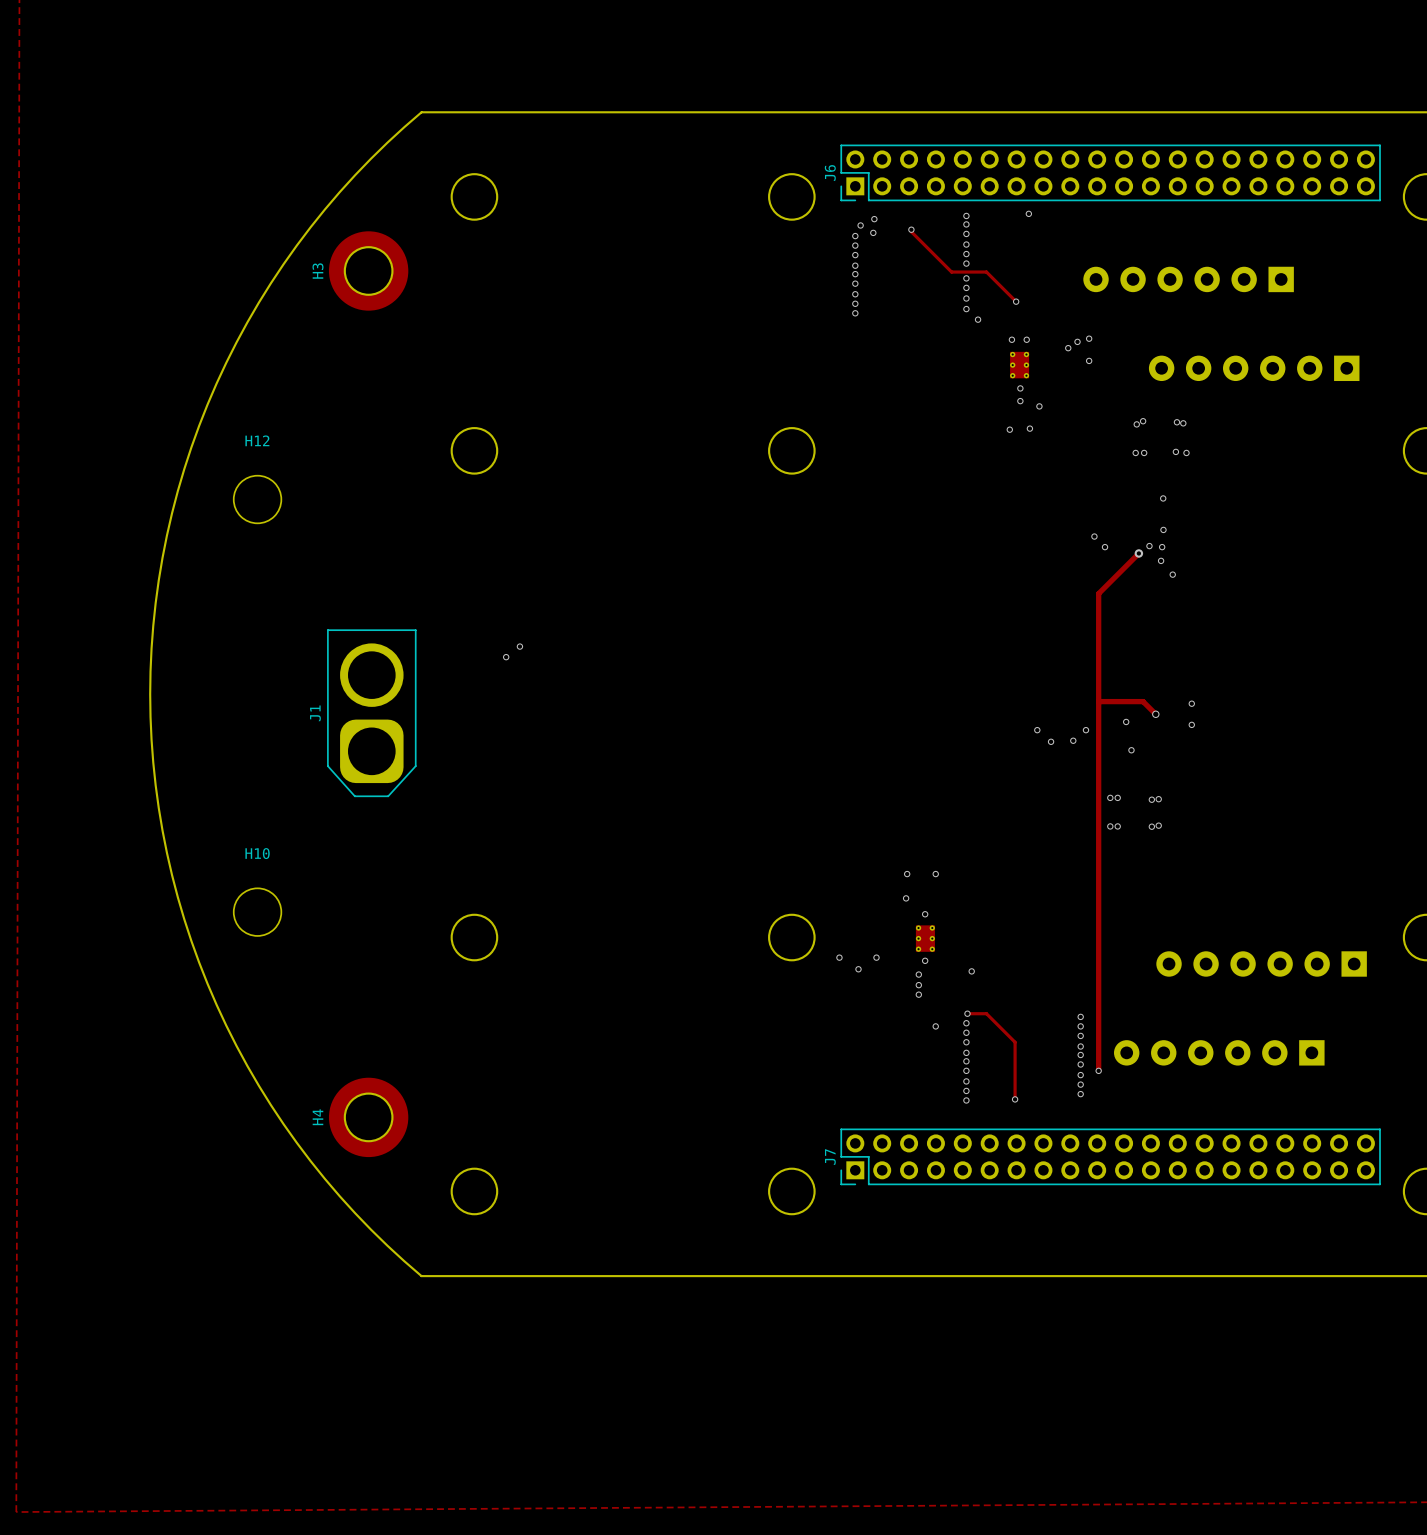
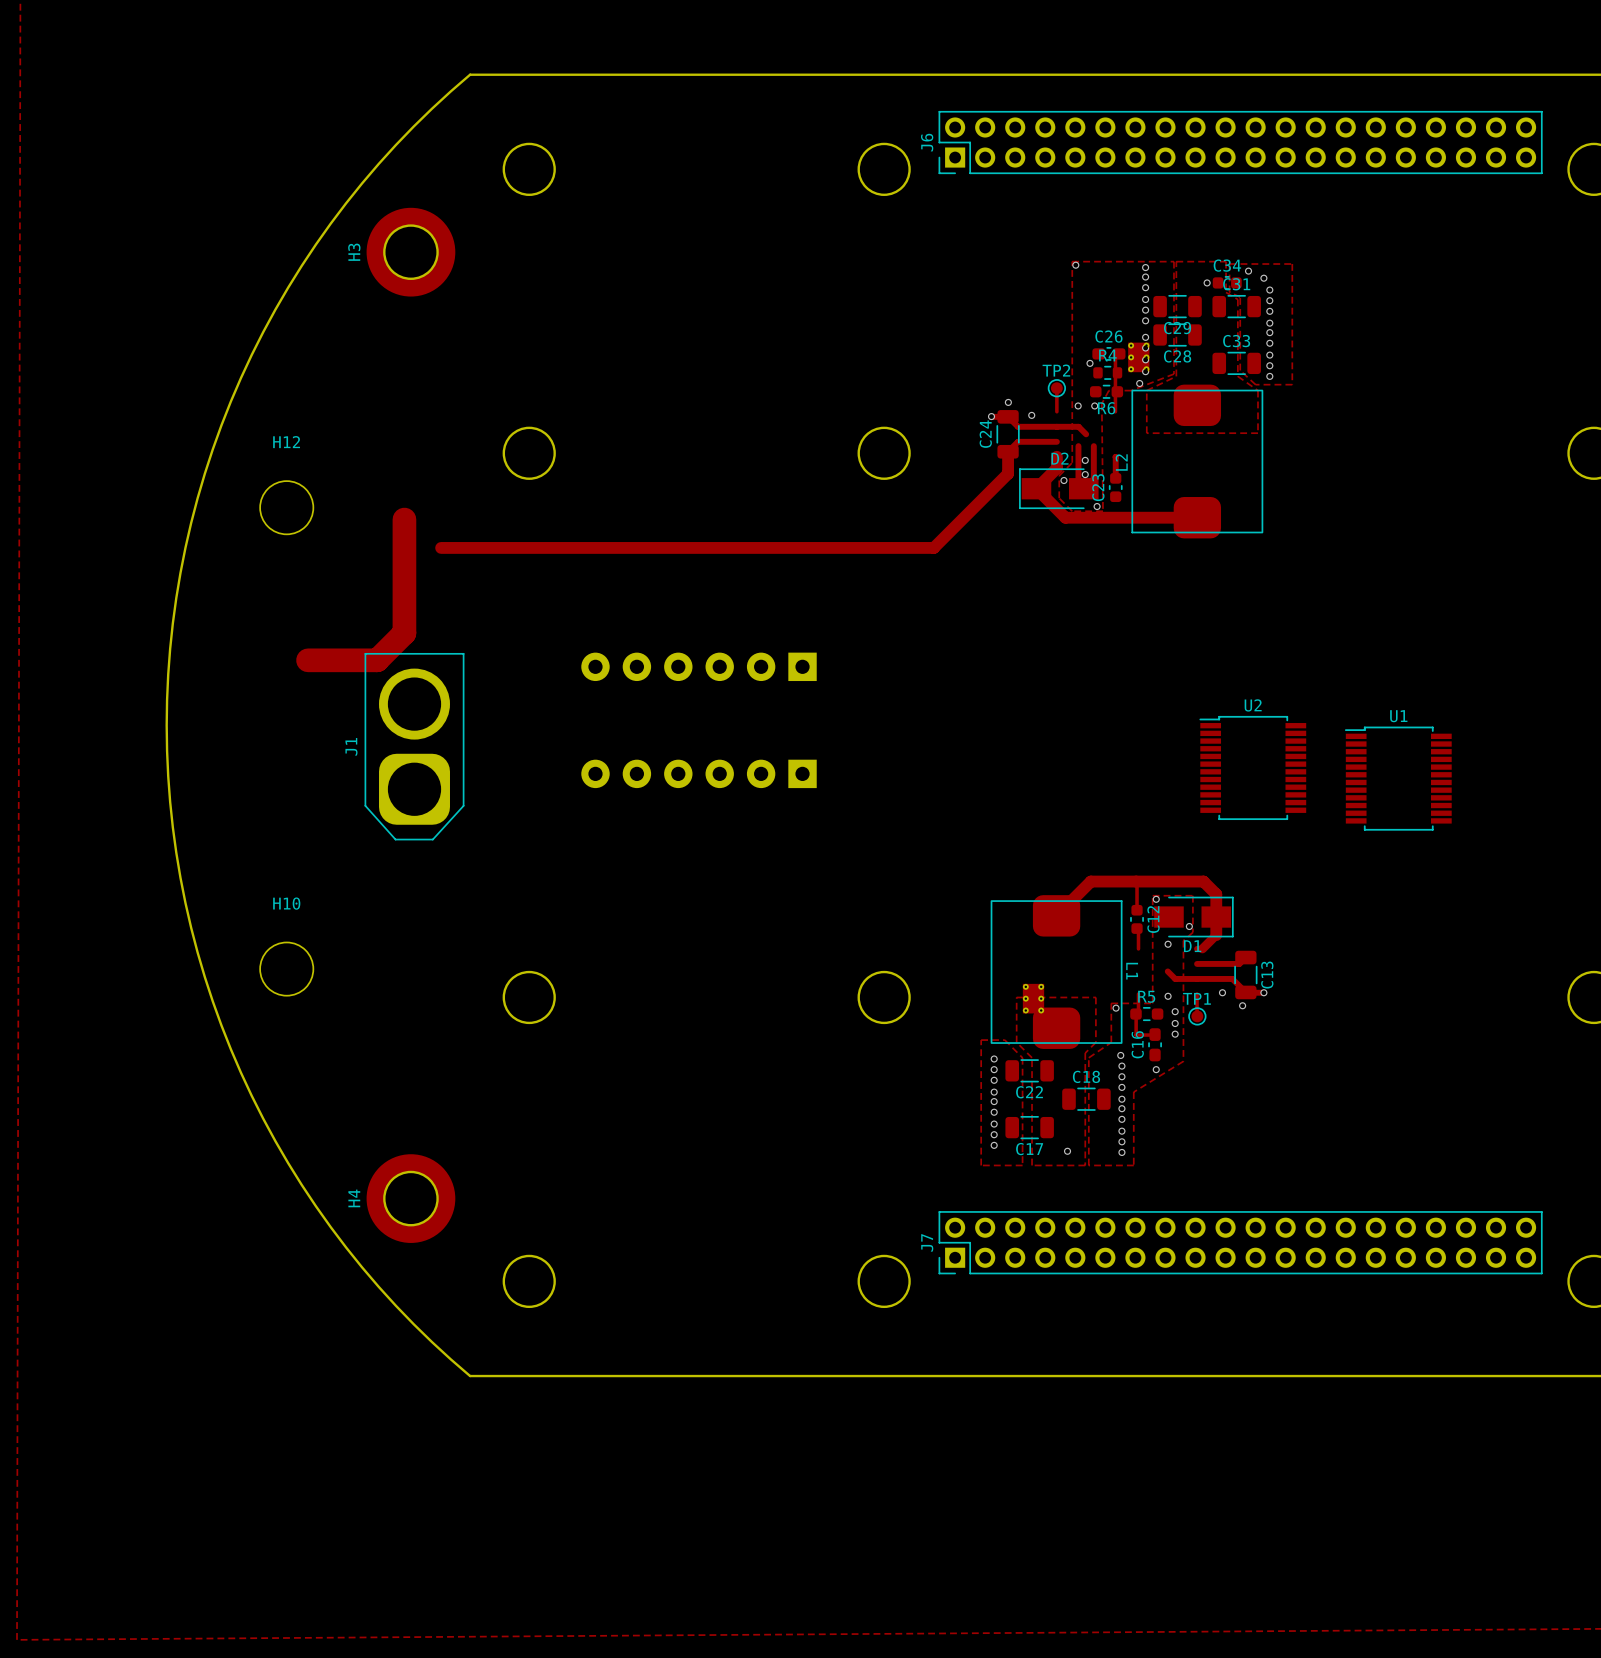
via: (1028, 213) -> none
via: (966, 215) -> none
via: (874, 219) -> none
via: (966, 224) -> none
via: (860, 225) -> none
track: (911, 229) (951, 272) (986, 272) (1016, 301) -> none
via: (911, 229) -> none
via: (873, 232) -> none
via: (966, 233) -> none
via: (855, 236) -> none
via: (966, 244) -> none
via: (855, 245) -> none
via: (966, 254) -> none
via: (855, 255) -> none
via: (966, 263) -> none
via: (855, 265) -> none
via: (855, 274) -> none
via: (966, 278) -> none
zone outline: none -> (1072, 261) (1072, 462) (1059, 475) (1059, 498) (1072, 511) (1103, 511) (1101, 403) (1108, 390) (1131, 390) (1173, 374) (1173, 261) (1072, 261)
zone outline: none -> (1176, 261) (1226, 261) (1226, 292) (1237, 299) (1237, 376) (1257, 390) (1257, 433) (1146, 433) (1146, 390) (1176, 376) (1176, 261)
part: (1188, 279) -> none
zone outline: none -> (1229, 264) (1229, 292) (1240, 297) (1240, 370) (1255, 384) (1292, 384) (1292, 264) (1229, 264)
via: none -> (1075, 265)
via: (855, 283) -> none
via: none -> (1145, 267)
via: (966, 287) -> none
via: none -> (1248, 271)
via: none -> (1145, 277)
via: (855, 294) -> none
via: none -> (1263, 278)
via: (966, 298) -> none
via: none -> (1207, 282)
C34: none -> (1227, 282)
via: (1016, 301) -> none
via: none -> (1145, 287)
via: (855, 303) -> none
via: none -> (1269, 290)
via: (966, 309) -> none
via: (855, 313) -> none
via: none -> (1145, 299)
via: none -> (1269, 300)
via: (978, 319) -> none
C29: none -> (1177, 306)
C31: none -> (1236, 306)
via: none -> (1145, 310)
via: none -> (1269, 311)
via: none -> (1145, 320)
via: none -> (1269, 323)
via: (1089, 338) -> none
via: (1011, 339) -> none
via: (1026, 339) -> none
via: (1077, 341) -> none
via: none -> (1269, 332)
C28: none -> (1177, 334)
via: none -> (1145, 337)
via: (1068, 348) -> none
via: none -> (1269, 343)
via: none -> (1145, 348)
via: (1089, 360) -> none
C26: none -> (1108, 353)
track: none -> (1119, 353) (1115, 357) (1115, 411)
via: none -> (1269, 355)
via: none -> (1145, 359)
part: (1254, 368) -> none
via: none -> (1090, 363)
C33: none -> (1236, 363)
via: none -> (1269, 365)
via: none -> (1145, 371)
R4: none -> (1107, 372)
via: none -> (1269, 376)
track: none -> (1056, 388) (1056, 411)
TP2: none -> (1056, 388)
R6: none -> (1106, 391)
via: (1020, 401) -> none
via: none -> (1008, 402)
via: (1039, 406) -> none
via: none -> (1078, 405)
via: none -> (1094, 405)
via: none -> (1031, 415)
track: none -> (991, 416) (1008, 416) (1018, 426) (1078, 426) (1086, 434)
via: none -> (991, 416)
via: (1143, 421) -> none
via: (1176, 422) -> none
via: (1183, 423) -> none
via: (1136, 424) -> none
via: (1029, 428) -> none
via: (1009, 429) -> none
C24: none -> (1008, 434)
track: none -> (1056, 441) (1018, 441) (1008, 451) (1008, 473) (933, 547) (441, 547)
track: none -> (1078, 446) (1078, 483) (1083, 488) (1093, 478) (1093, 446)
via: (1175, 451) -> none
via: (1135, 452) -> none
via: (1144, 452) -> none
via: (1186, 452) -> none
track: none -> (1056, 456) (1056, 468) (1036, 488) (1065, 517) (1197, 517)
track: none -> (1115, 456) (1115, 478)
via: none -> (1085, 460)
L2: none -> (1197, 461)
via: none -> (1085, 474)
via: none -> (1063, 480)
C23: none -> (1115, 487)
D2: none -> (1058, 488)
via: none -> (1097, 506)
via: (1163, 498) -> none
track: none -> (404, 519) (404, 633) (377, 660) (308, 660)
via: (1163, 529) -> none
via: (1094, 536) -> none
via: (1149, 546) -> none
via: (1105, 547) -> none
via: (1162, 547) -> none
track: (1138, 553) (1098, 593) (1098, 1070) -> none
via: (1138, 553) -> none
via: (1161, 560) -> none
via: (1172, 574) -> none
part: none -> (699, 666)
via: (519, 646) -> none
via: (506, 657) -> none
track: (1098, 701) (1143, 701) (1155, 714) -> none
via: (1191, 703) -> none
via: (1155, 714) -> none
via: (1126, 721) -> none
via: (1191, 724) -> none
via: (1037, 730) -> none
via: (1085, 730) -> none
U2: none -> (1252, 767)
part: none -> (699, 773)
via: (1073, 740) -> none
via: (1051, 741) -> none
U1: none -> (1398, 778)
via: (1131, 750) -> none
via: (1110, 797) -> none
via: (1117, 797) -> none
via: (1151, 799) -> none
via: (1158, 799) -> none
via: (1158, 825) -> none
via: (1110, 826) -> none
via: (1117, 826) -> none
via: (1151, 826) -> none
track: none -> (1136, 881) (1137, 910)
zone outline: none -> (1152, 895) (1152, 1003) (1111, 1003) (1111, 1042) (1088, 1057) (1088, 1165) (1133, 1165) (1133, 1092) (1183, 1061) (1183, 940) (1192, 932) (1192, 895) (1152, 895)
via: none -> (1156, 899)
track: none -> (1056, 915) (1090, 881) (1203, 881) (1216, 894) (1216, 935) (1202, 948) (1197, 948)
D1: none -> (1193, 917)
C12: none -> (1137, 919)
via: (907, 874) -> none
via: (935, 874) -> none
via: none -> (1189, 926)
track: none -> (1137, 928) (1138, 948)
via: none -> (1168, 944)
via: (906, 898) -> none
track: none -> (1245, 957) (1239, 963) (1197, 963)
via: (925, 914) -> none
L1: none -> (1056, 972)
track: none -> (1167, 971) (1175, 978) (1232, 978) (1246, 992) (1263, 992)
C13: none -> (1245, 975)
via: none -> (1222, 992)
via: none -> (1263, 992)
track: none -> (1138, 993) (1138, 1011) (1135, 1014)
track: none -> (1197, 993) (1197, 1016)
via: none -> (1168, 996)
zone outline: none -> (1016, 997) (1016, 1042) (1032, 1057) (1032, 1165) (1085, 1165) (1085, 1053) (1095, 1042) (1095, 997) (1016, 997)
via: none -> (1242, 1005)
via: none -> (1116, 1008)
via: none -> (1175, 1011)
track: none -> (1136, 1014) (1136, 1035) (1155, 1034)
R5: none -> (1146, 1014)
TP1: none -> (1197, 1016)
via: (839, 957) -> none
via: (876, 957) -> none
via: (925, 960) -> none
via: none -> (1175, 1023)
part: (1261, 963) -> none
via: (858, 969) -> none
via: none -> (1175, 1034)
via: (971, 971) -> none
via: (918, 974) -> none
zone outline: none -> (981, 1040) (981, 1165) (1022, 1165) (1022, 1057) (1004, 1040) (981, 1040)
C16: none -> (1155, 1044)
via: (918, 985) -> none
via: none -> (1120, 1055)
via: none -> (994, 1058)
via: (918, 994) -> none
via: none -> (1121, 1066)
via: none -> (994, 1069)
via: none -> (1156, 1069)
C22: none -> (1029, 1070)
via: none -> (1121, 1076)
via: none -> (994, 1080)
track: (967, 1013) (986, 1013) (1015, 1042) (1015, 1099) -> none
via: (967, 1013) -> none
via: (1080, 1016) -> none
via: none -> (1121, 1087)
via: none -> (994, 1092)
via: (966, 1023) -> none
via: (935, 1026) -> none
via: (1080, 1026) -> none
C18: none -> (1086, 1099)
via: none -> (1121, 1099)
via: none -> (994, 1101)
via: (966, 1032) -> none
via: (1080, 1035) -> none
via: none -> (1121, 1108)
via: none -> (994, 1112)
via: (966, 1042) -> none
via: none -> (1121, 1119)
via: (1080, 1046) -> none
via: none -> (994, 1124)
via: (966, 1052) -> none
part: (1219, 1052) -> none
C17: none -> (1029, 1127)
via: (1080, 1054) -> none
via: none -> (1121, 1131)
via: none -> (994, 1134)
via: (966, 1061) -> none
via: (1080, 1064) -> none
via: none -> (1121, 1141)
via: none -> (994, 1145)
via: (966, 1070) -> none
via: (1098, 1070) -> none
via: none -> (1067, 1151)
via: (1080, 1075) -> none
via: none -> (1121, 1152)
via: (966, 1081) -> none
via: (1080, 1084) -> none
via: (966, 1090) -> none
via: (1080, 1094) -> none
via: (1015, 1099) -> none
via: (966, 1100) -> none

